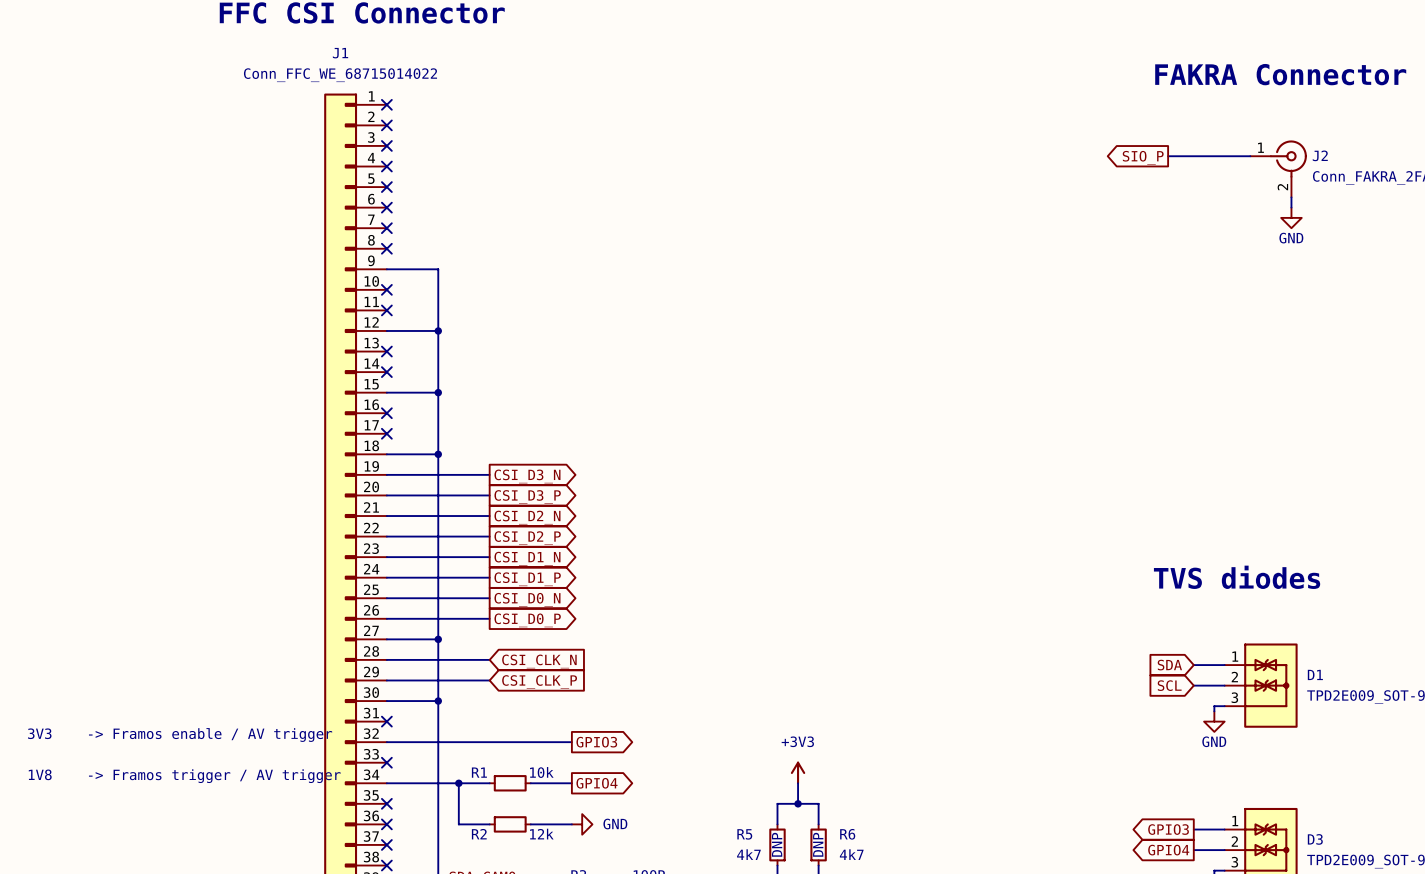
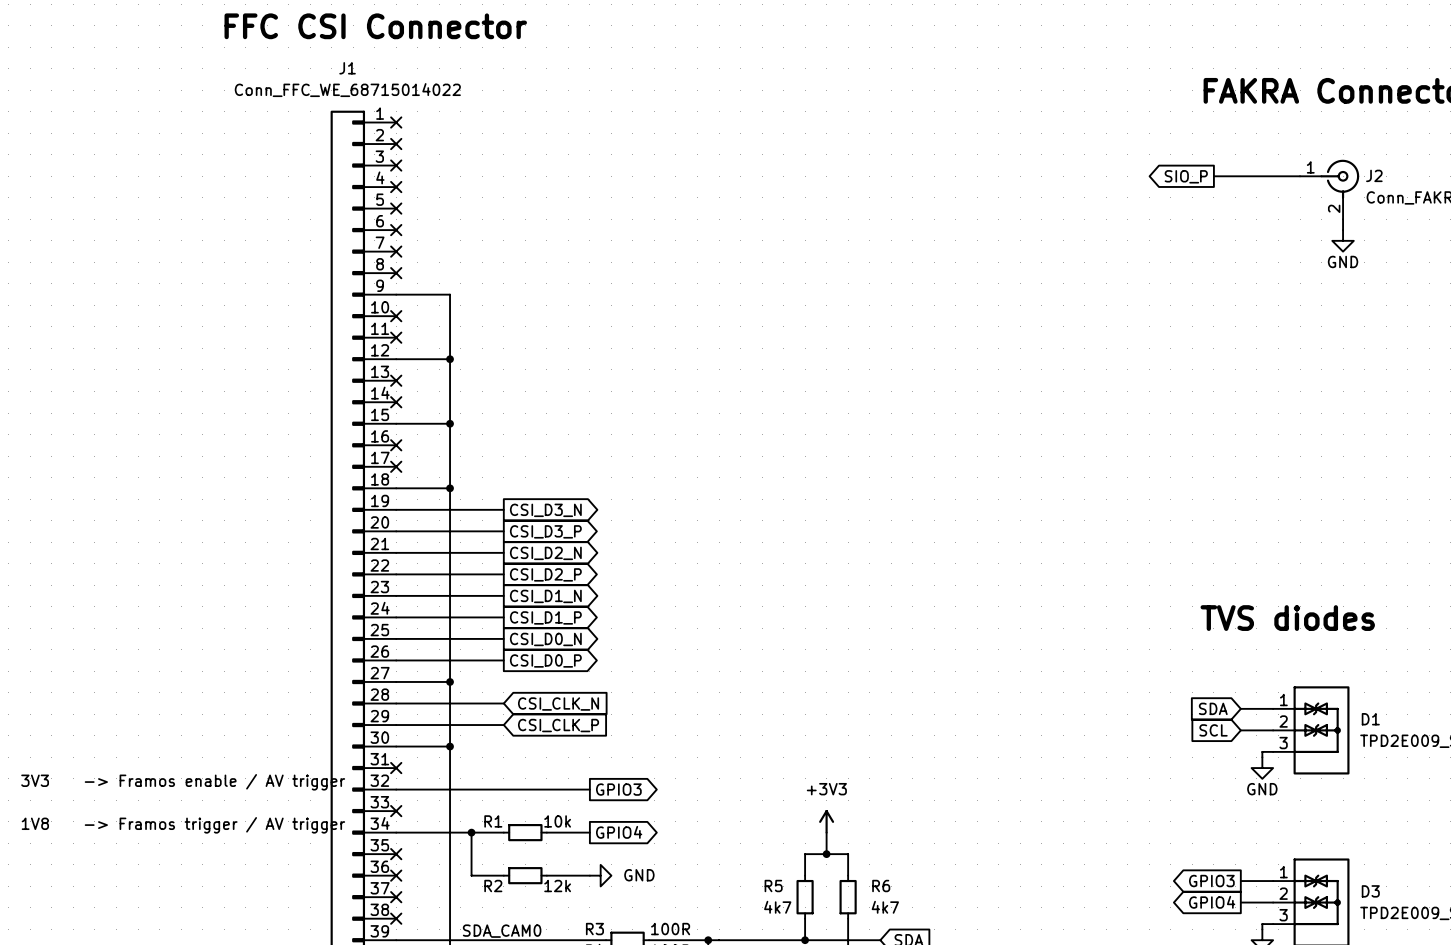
R5 text: DNP (777, 844) -> none
R6 text: DNP (818, 844) -> none

